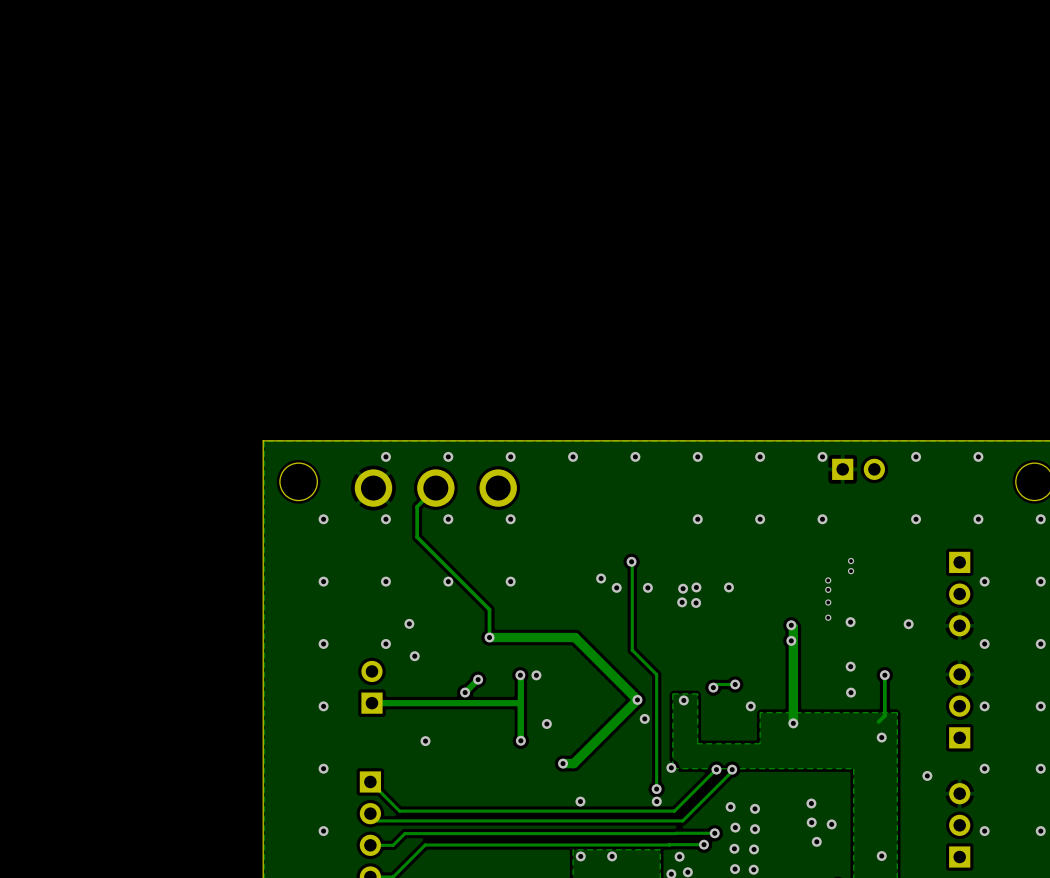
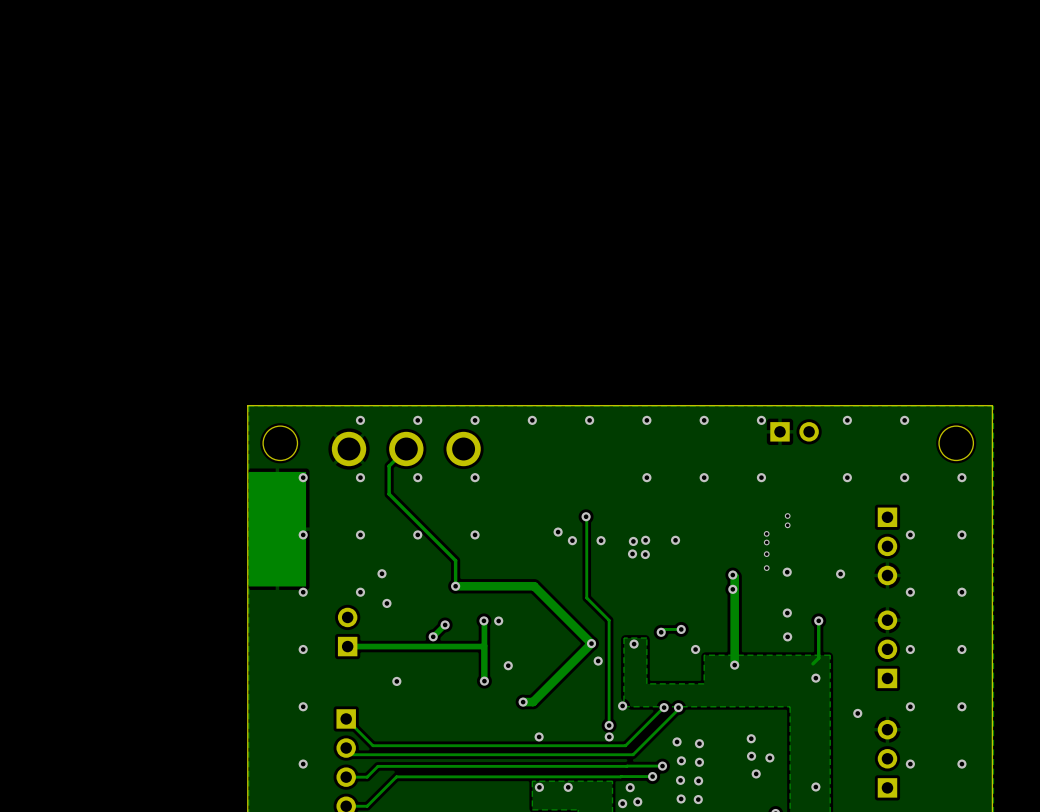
part: none -> (277, 529)

